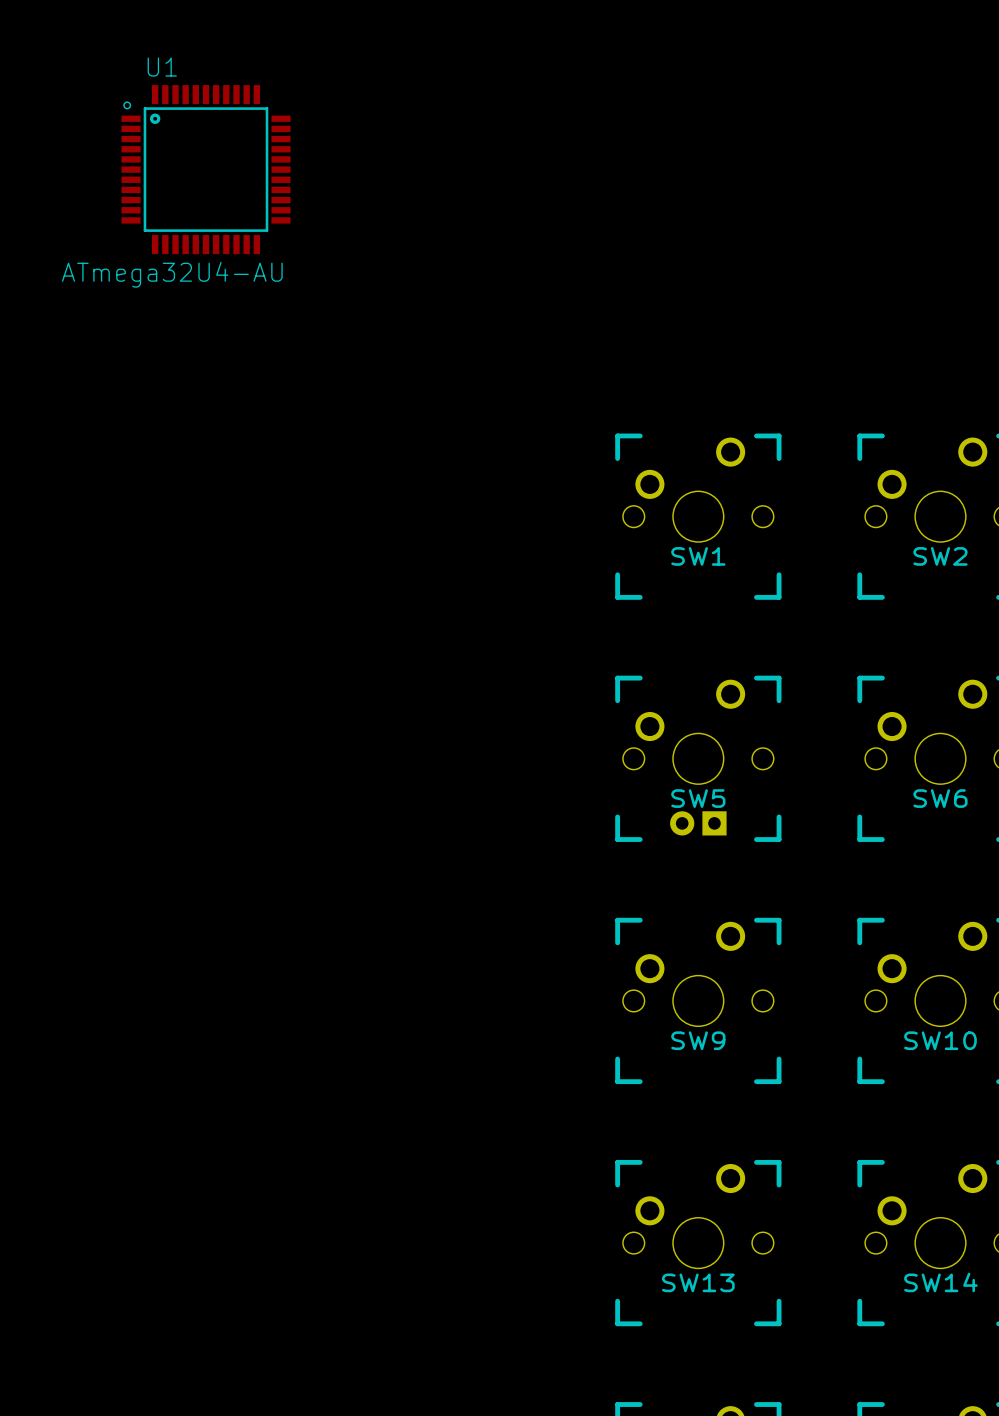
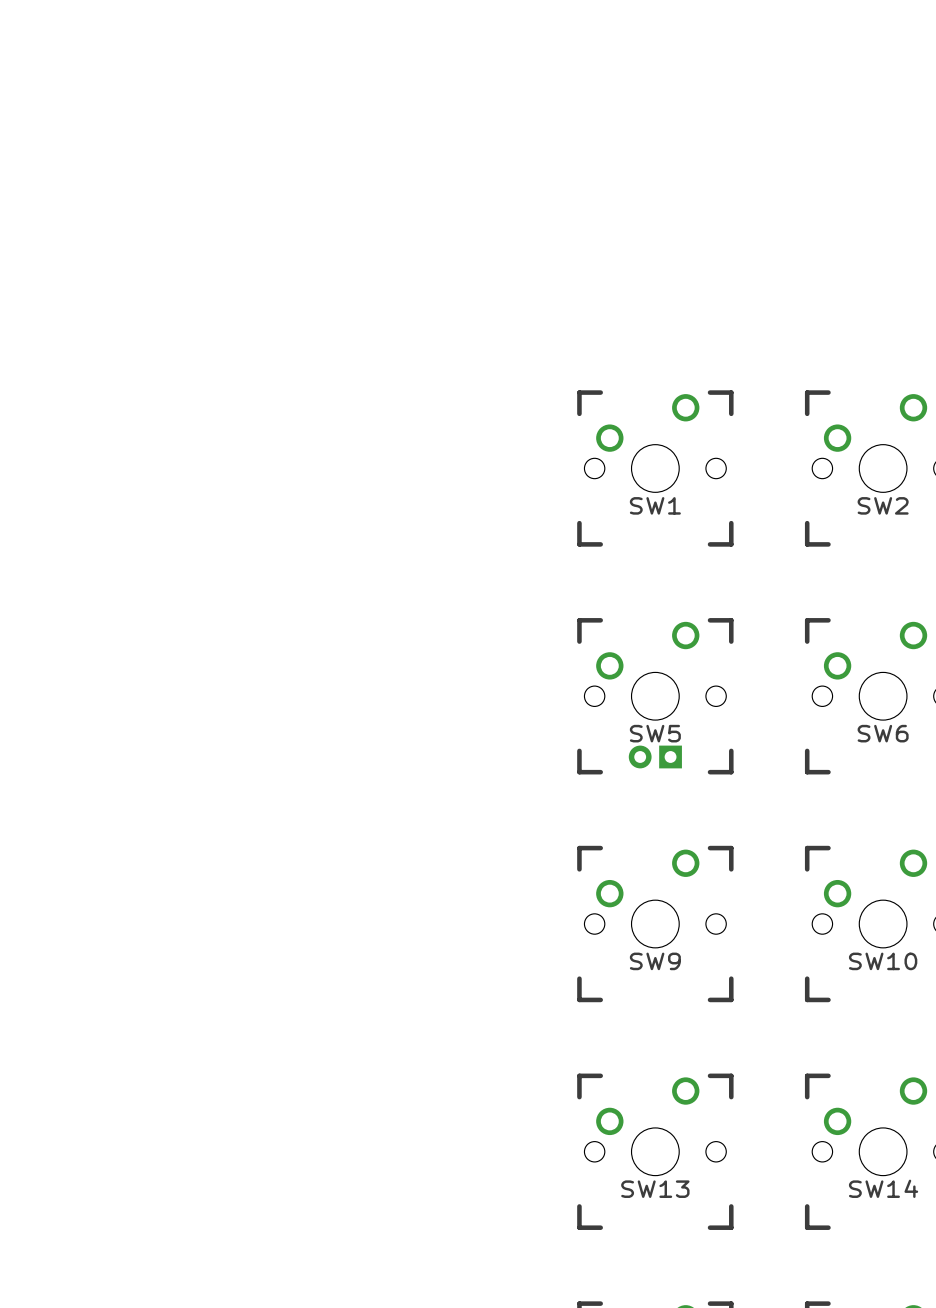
U1: ATmega32U4-AU (205, 169) -> none

